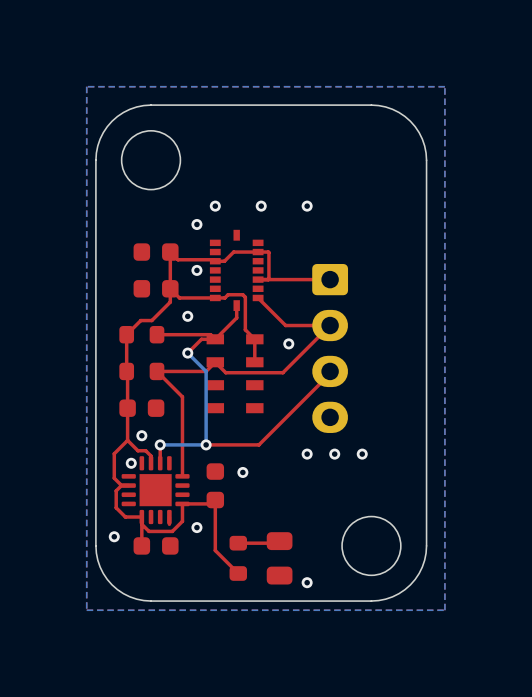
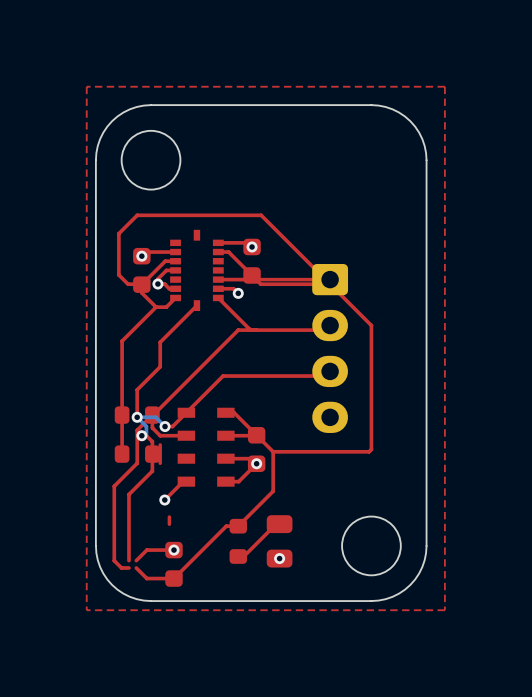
bottom zone outline: (444, 86) (444, 610) (86, 610) (86, 86) (444, 86) -> none
via: (215, 206) -> none
via: (261, 206) -> none
via: (307, 206) -> none
via: (196, 224) -> none
part footprint: [209, 229, 264, 312] -> [243, 238, 261, 284]
top track: none -> (218, 242) (247, 242) (252, 247)
via: none -> (252, 247)
part: (156, 252) -> none
top track: none -> (175, 252) (145, 252) (141, 256)
top track: none -> (218, 252) (228, 252) (260, 284) (330, 284)
via: none -> (141, 256)
top track: none -> (175, 261) (165, 261) (141, 284)
part: none -> (141, 270)
top track: none -> (175, 270) (166, 270) (157, 278) (157, 284) (164, 284) (169, 288) (175, 288)
part: none -> (196, 270)
via: (196, 270) -> none
top track: none -> (252, 275) (247, 279) (218, 279)
top track: (268, 279) (268, 252) (233, 252) (224, 261) (178, 259) (170, 252) (170, 302) (151, 320) (140, 320) (126, 334) (127, 440) -> none
top track: none -> (141, 284) (141, 292) (156, 307)
top track: none -> (141, 284) (128, 284) (118, 275) (118, 233) (137, 215) (261, 215) (371, 325) (371, 449) (369, 451) (273, 451)
via: none -> (157, 284)
part: (156, 288) -> none
top track: (170, 288) (179, 297) (224, 297) (228, 294) (242, 294) (245, 297) (245, 329) (254, 339) (254, 362) -> none
top track: none -> (218, 288) (233, 288) (238, 293)
via: none -> (238, 293)
top track: none -> (175, 297) (166, 307) (156, 307)
top track: none -> (218, 297) (250, 330)
top track: (258, 297) (285, 325) (330, 325) (282, 372) (225, 372) (215, 362) (206, 371) (156, 371) (182, 396) (182, 476) -> none
top track: none -> (196, 305) (160, 342) (160, 366) (137, 389) (137, 417)
top track: (236, 305) (236, 317) (215, 339) -> none
top track: none -> (156, 307) (122, 341) (122, 454)
via: (187, 316) -> none
top track: none -> (330, 330) (238, 330) (152, 415)
part: (141, 334) -> none
top track: (156, 334) (210, 334) (215, 339) -> none
top track: (215, 339) (201, 339) (187, 353) -> none
via: (288, 343) -> none
bottom track: (187, 353) (206, 371) (206, 444) (160, 444) -> none
via: (187, 353) -> none
part: (141, 371) -> none
part position: (235, 373) -> (206, 447)
top track: (330, 373) (258, 444) (206, 444) -> none
top track: none -> (330, 376) (223, 376) (172, 426) (165, 426)
part footprint: [119, 399, 165, 417] -> [114, 406, 160, 424]
top track: none -> (225, 412) (234, 412) (273, 451)
top track: none -> (152, 415) (152, 427) (160, 435) (186, 435)
top track: none -> (152, 415) (137, 430) (137, 463) (114, 486) (114, 560) (121, 567) (128, 567)
via: none -> (137, 417)
bottom track: none -> (165, 426) (155, 417) (137, 417) (146, 426) (146, 435)
via: none -> (165, 426)
top track: none -> (146, 435) (152, 441) (152, 471) (128, 494) (128, 560)
top track: none -> (256, 435) (225, 435)
top track: (127, 440) (137, 450) (145, 450) (151, 456) (151, 463) -> none
top track: (127, 440) (114, 453) (114, 478) (121, 485) (128, 485) -> none
via: (160, 444) -> none
via: (206, 444) -> none
part: none -> (256, 449)
top track: none -> (273, 451) (273, 491) (238, 526) (226, 526) (173, 578) (146, 578) (136, 567)
part: none -> (137, 454)
via: (307, 454) -> none
via: (334, 454) -> none
via: (362, 454) -> none
top track: none -> (225, 458) (251, 458) (256, 463) (238, 481) (225, 481)
via: (131, 463) -> none
via position: (242, 472) -> (256, 463)
top track: none -> (186, 481) (183, 481) (164, 500)
top track: (121, 485) (116, 490) (116, 507) (125, 517) (141, 517) (141, 545) -> none
part: (215, 485) -> none
part: (155, 490) -> none
via: none -> (164, 500)
top track: (141, 524) (149, 531) (172, 531) (182, 521) (182, 503) (211, 503) (215, 500) (215, 550) (238, 573) -> none
top track: none -> (279, 524) (276, 524) (242, 558) (238, 558)
via: (196, 527) -> none
via: (114, 536) -> none
top track: (279, 541) (277, 543) (238, 543) -> none
part rotation: 0° (156, 545) -> 90° clockwise (173, 564)
top track: none -> (173, 550) (146, 550) (136, 560)
via: none -> (173, 550)
part position: (238, 558) -> (238, 541)
part position: (279, 558) -> (279, 541)
via position: (307, 582) -> (279, 558)

